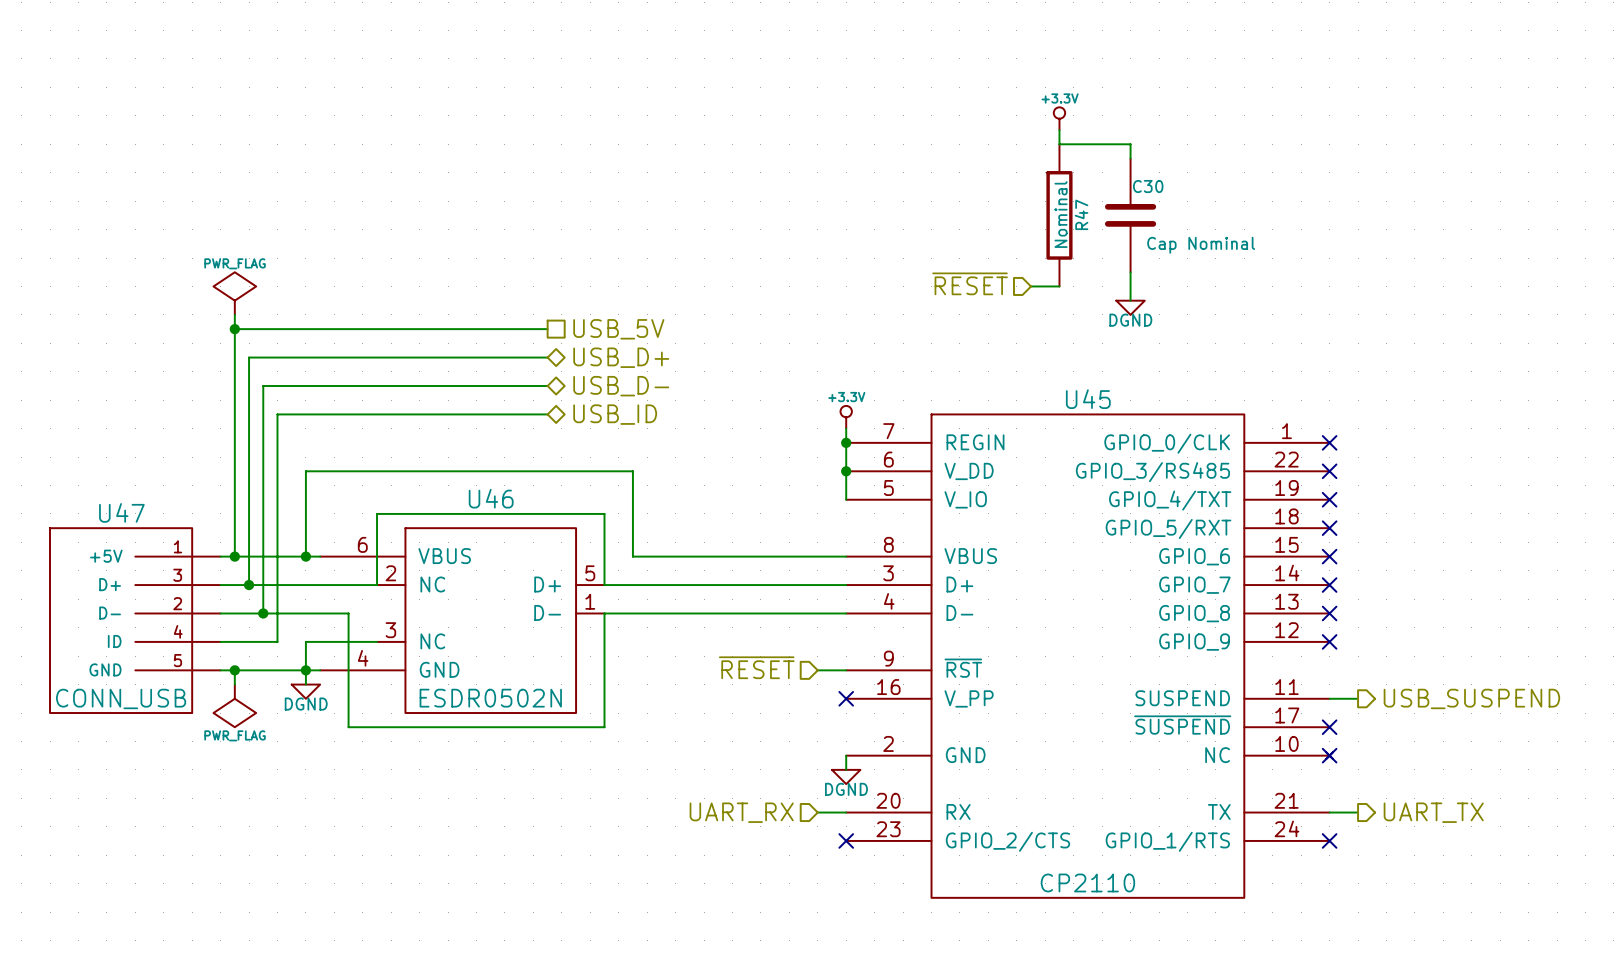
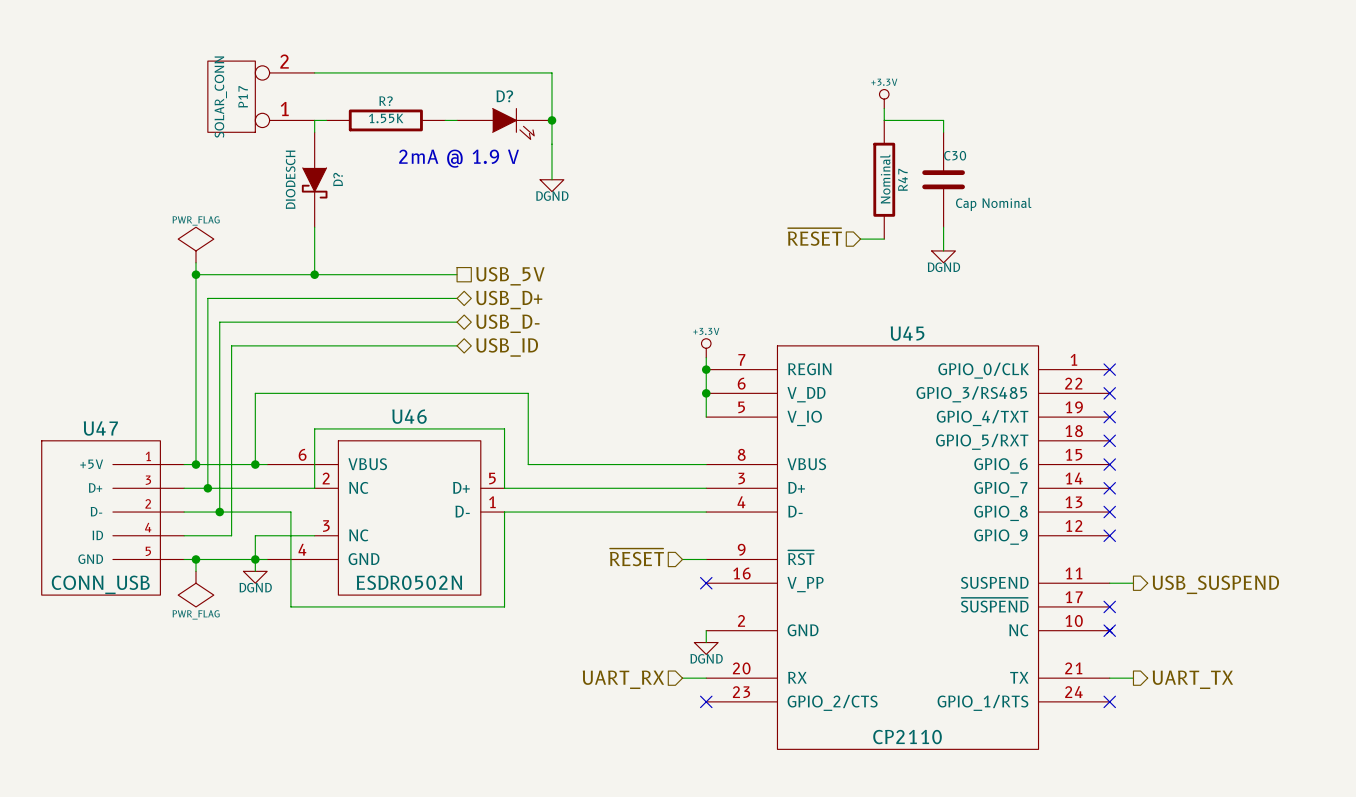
wire: none -> (314, 72) (551, 72) (551, 179)
P17: none -> SOLAR_CONN (261, 96)
wire: none -> (326, 120) (314, 120) (314, 132)
R?: none -> 1.55K (385, 120)
wire: none -> (445, 120) (457, 120)
junction: none -> (551, 120)
D?: none -> (504, 123)
text: none -> 2mA @ 1.9 V (459, 158)
D?: none -> DIODESCH (314, 179)
power symbol: none -> DGND (551, 185)
wire: none -> (314, 227) (314, 274)
junction: none -> (314, 274)

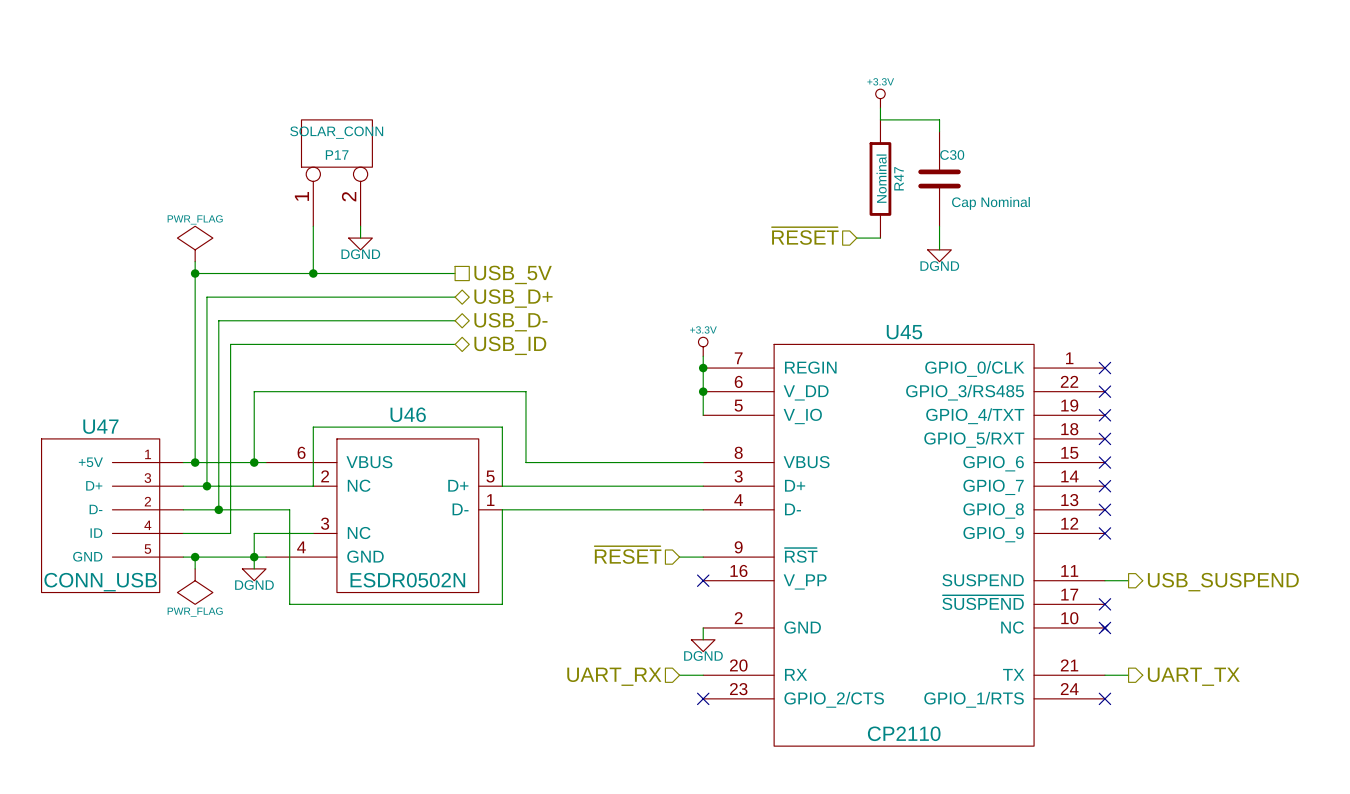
wire: (314, 72) (551, 72) (551, 179) -> none
P17 rotation: 0° (231, 96) -> 90° clockwise (336, 143)
P17 position: (261, 96) -> (336, 173)
R?: 1.55K (385, 120) -> none
wire: (445, 120) (457, 120) -> none
junction: (551, 120) -> none
D?: (504, 123) -> none
text: 2mA @ 1.9 V (459, 158) -> none
D?: DIODESCH (314, 179) -> none
power symbol position: DGND (551, 185) -> DGND (360, 243)
wire: none -> (360, 226) (360, 238)

